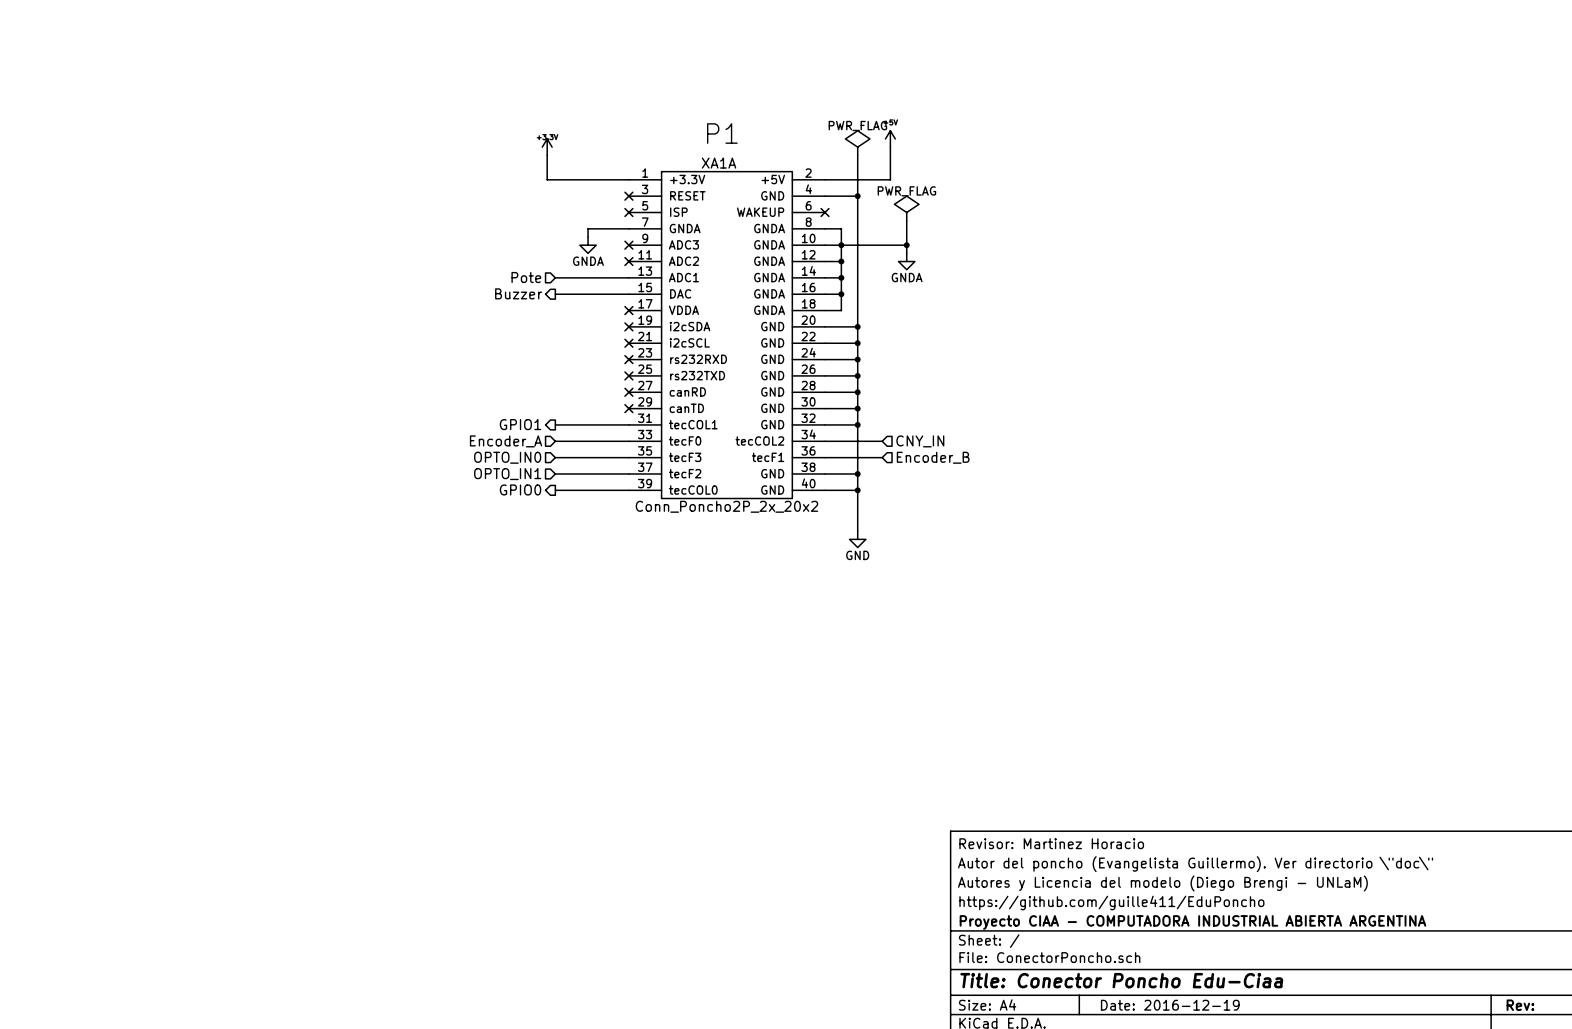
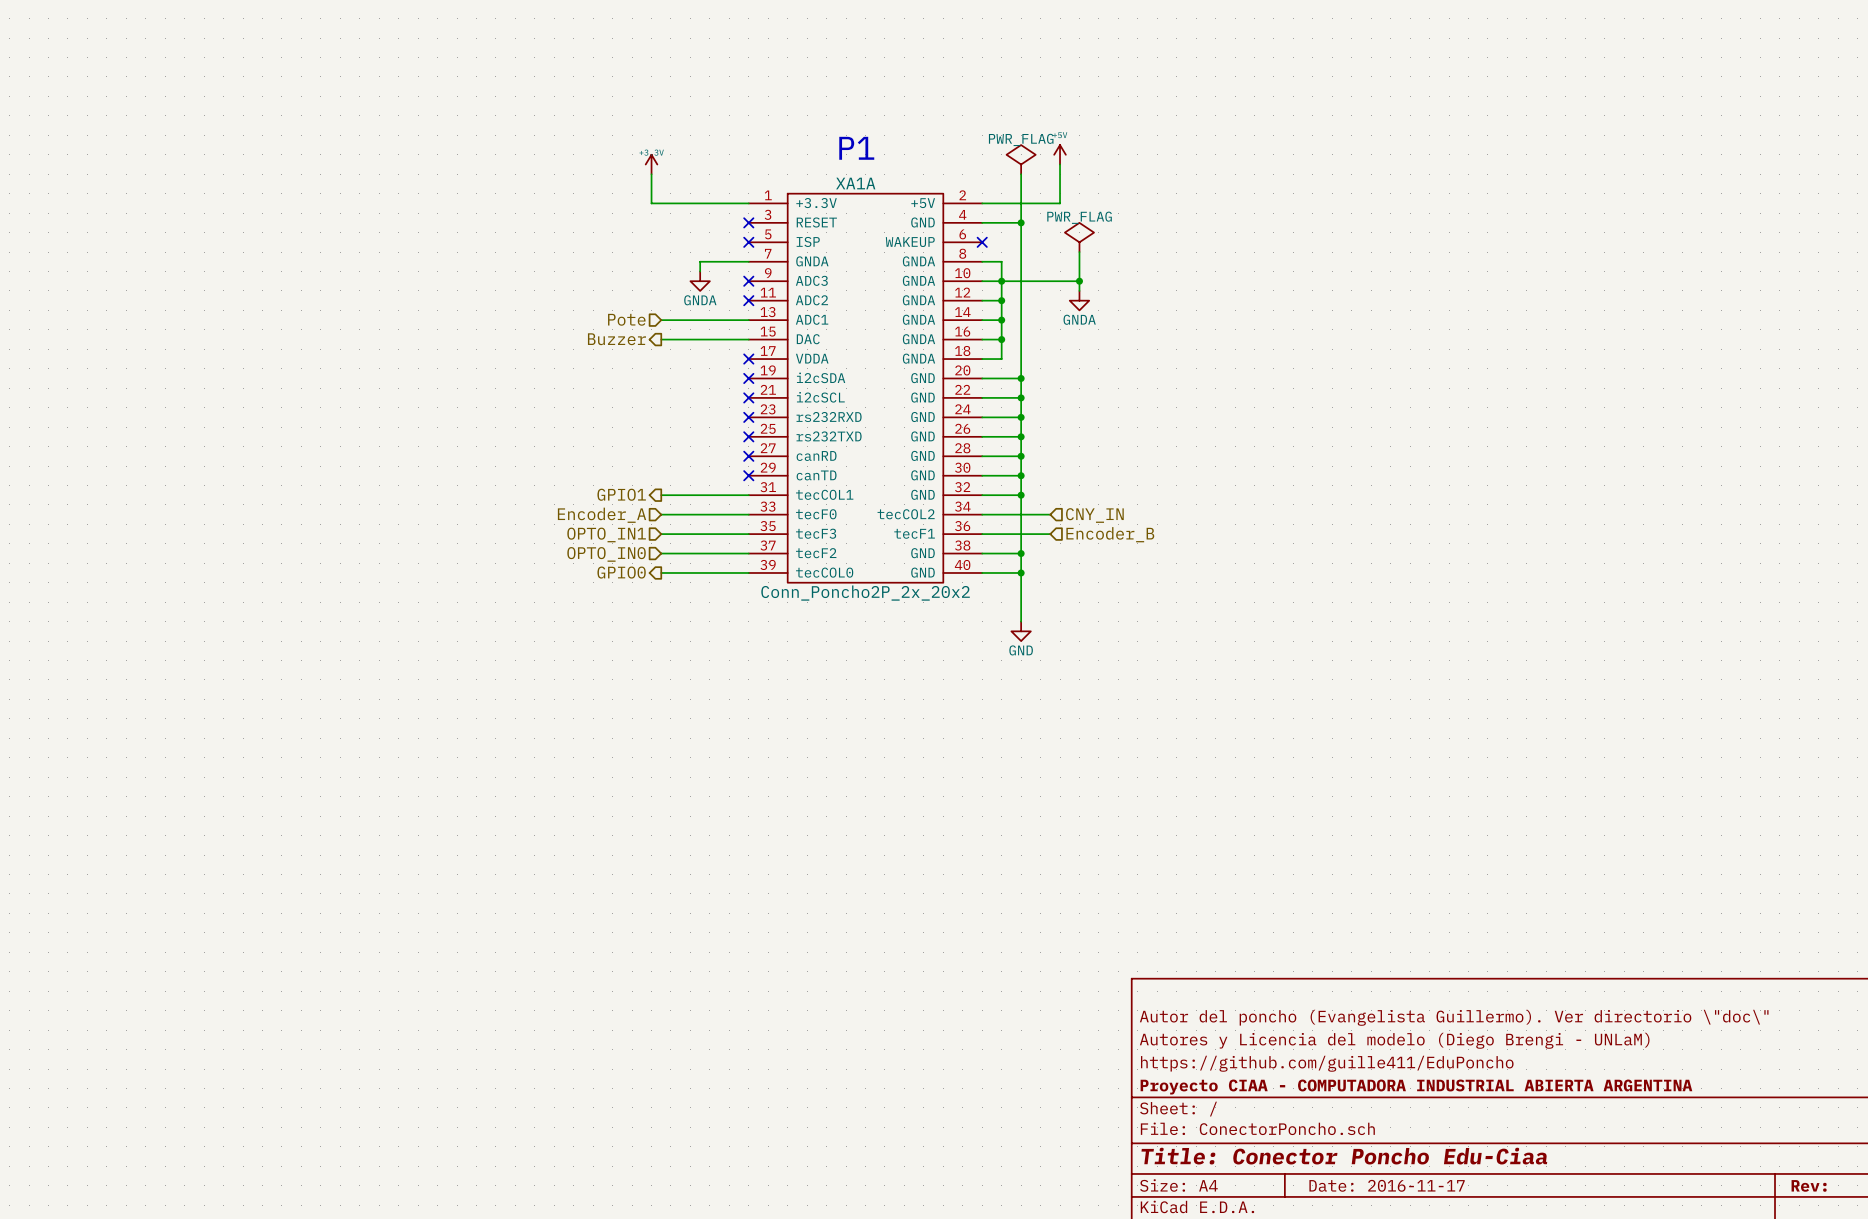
hierarchical label: OPTO_IN0 (507, 457) -> OPTO_IN1 (606, 534)
hierarchical label: OPTO_IN1 (507, 474) -> OPTO_IN0 (606, 554)
title block: Revisor: Martinez Horacio (1051, 843) -> none
title block: Date: 2016-12-19 (1170, 1005) -> Date: 2016-11-17 (1387, 1185)

